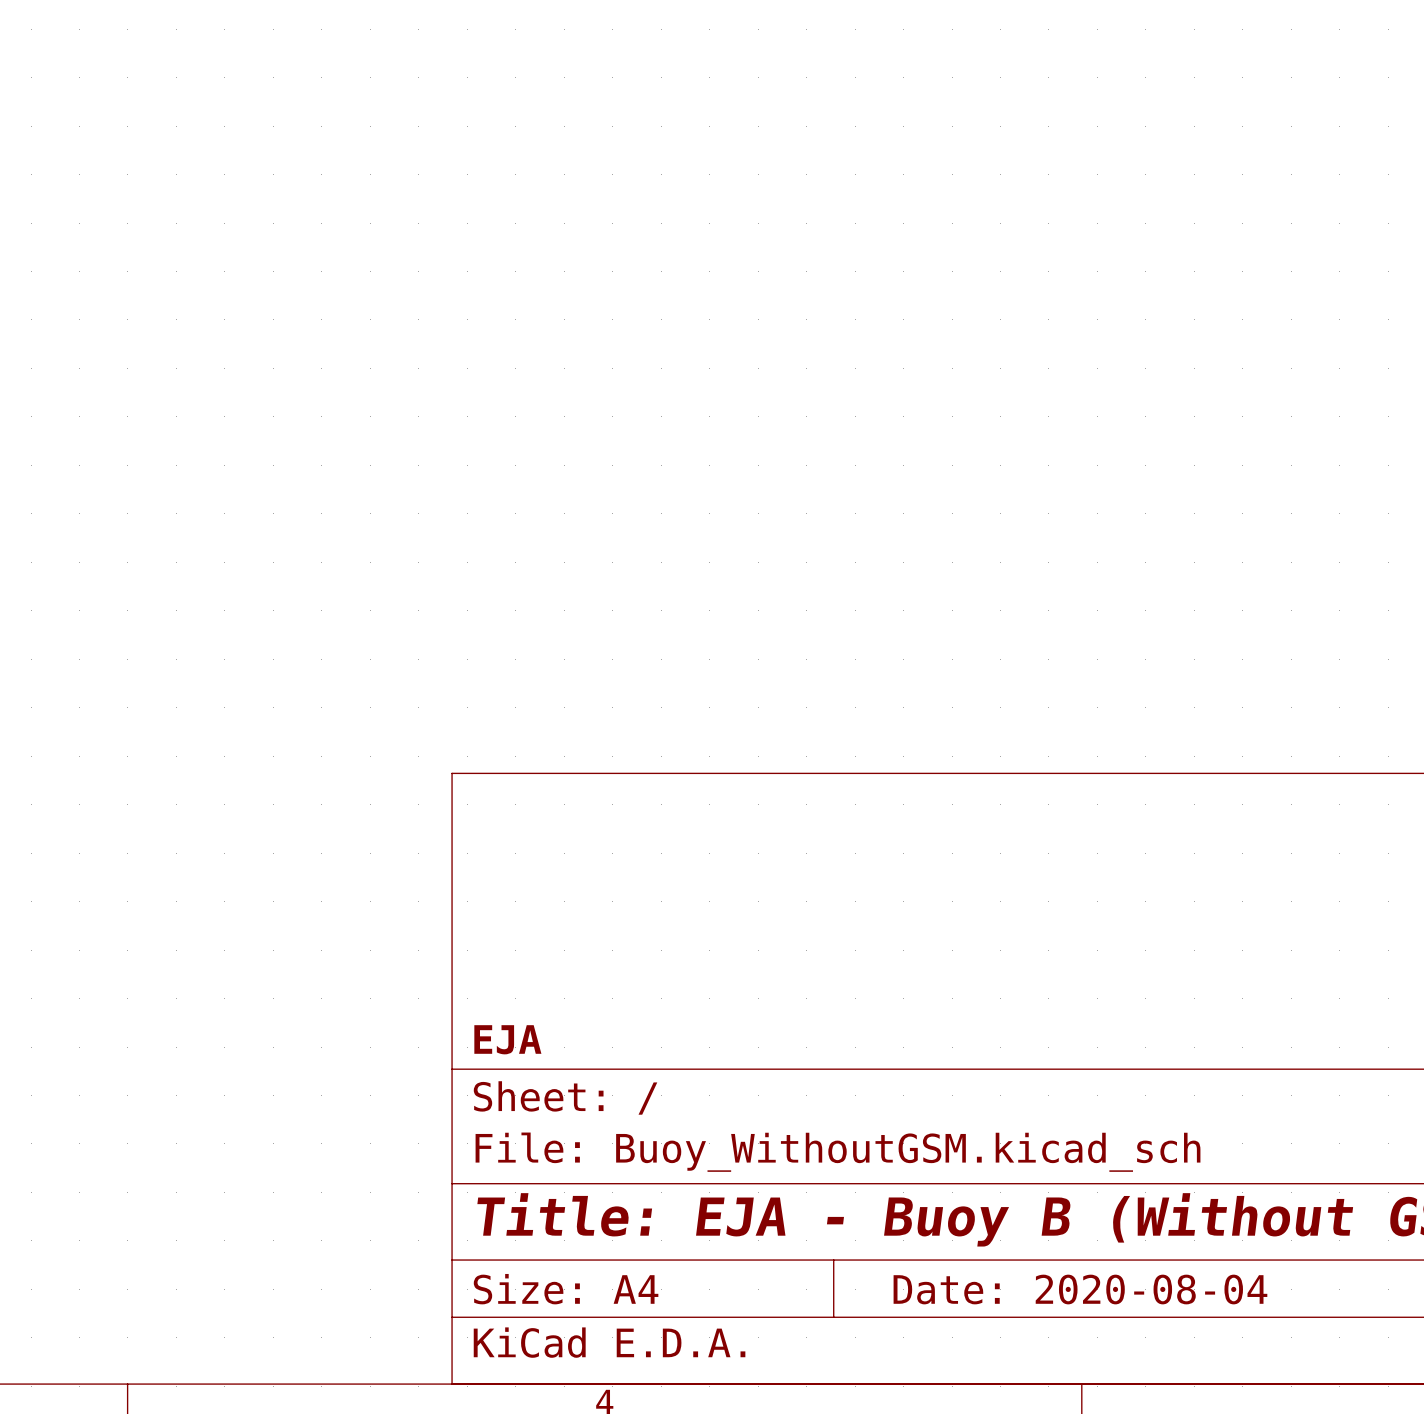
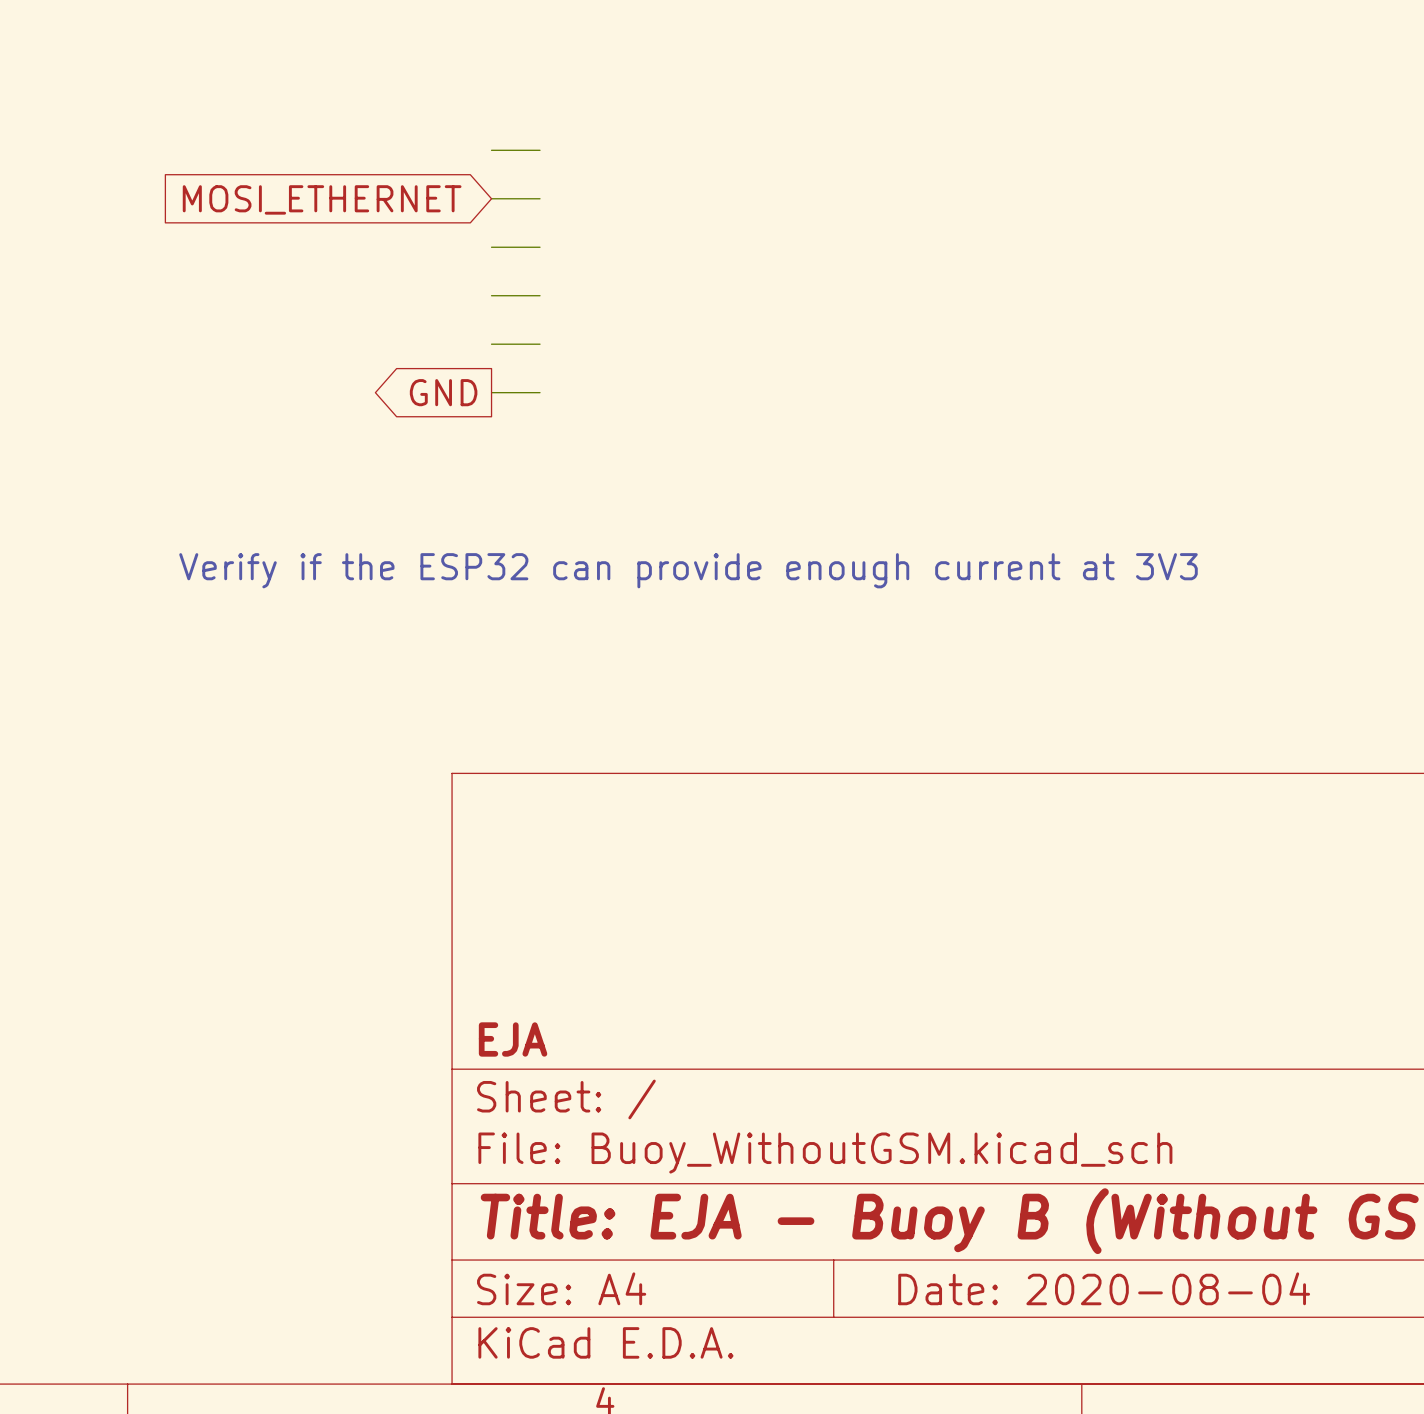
wire: none -> (491, 150) (540, 150)
wire: none -> (491, 198) (540, 198)
global label: none -> MOSI_ETHERNET (322, 199)
wire: none -> (491, 247) (540, 247)
wire: none -> (491, 295) (540, 295)
wire: none -> (491, 344) (540, 344)
global label: none -> GND (443, 392)
wire: none -> (491, 392) (540, 392)
text: none -> Verify if the ESP32 can provide enough current at 3V3 (688, 570)

